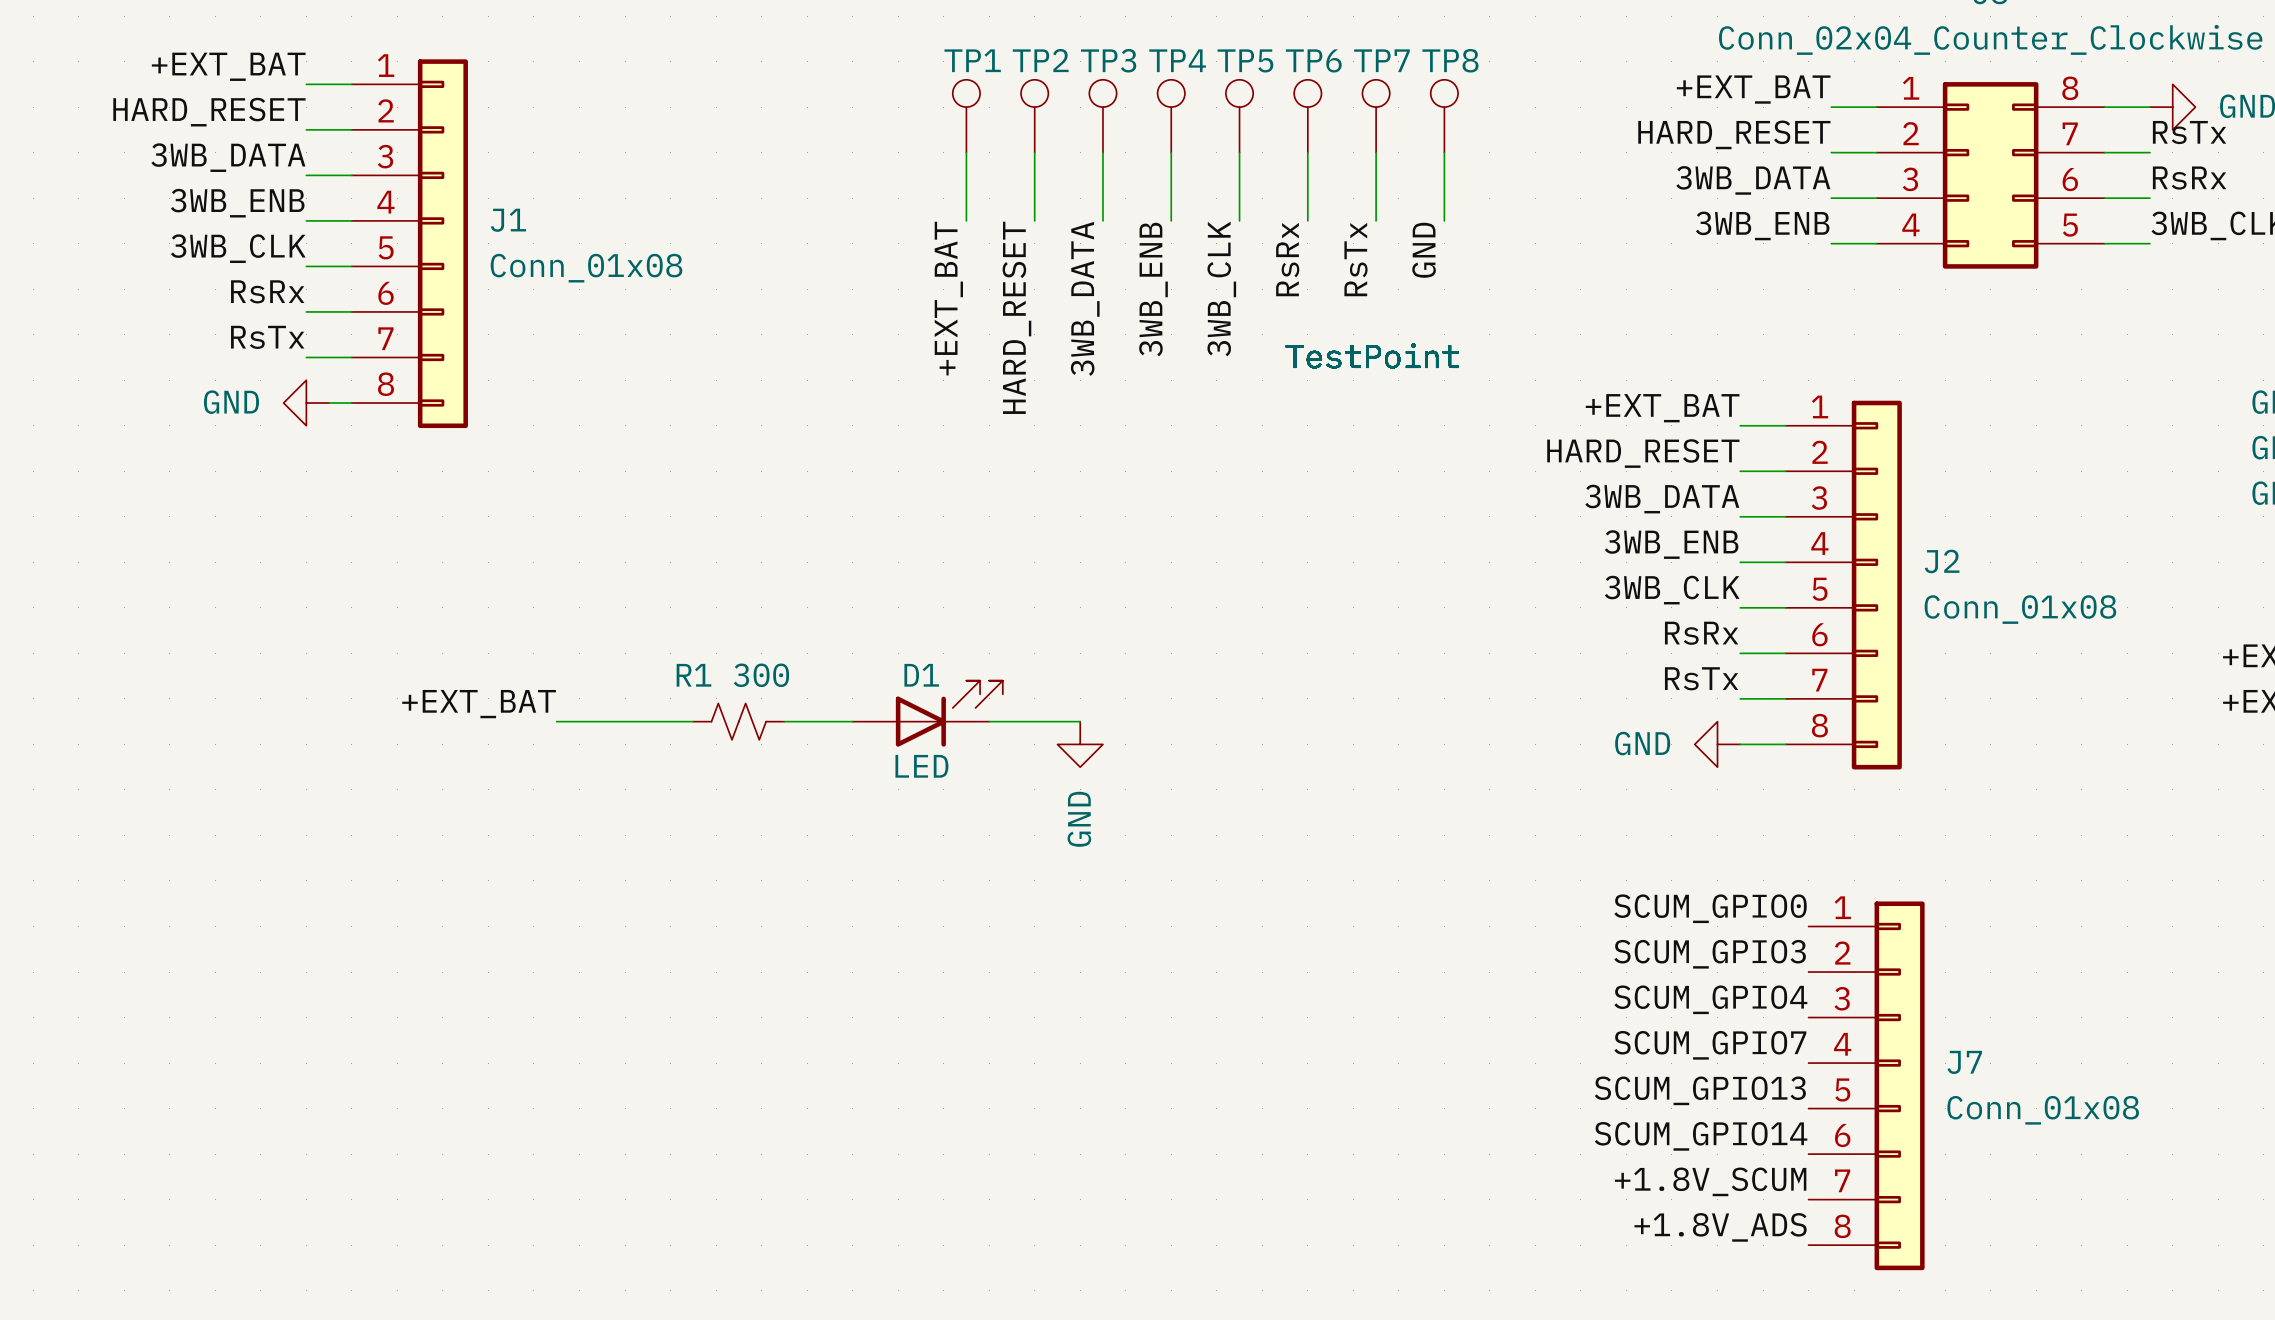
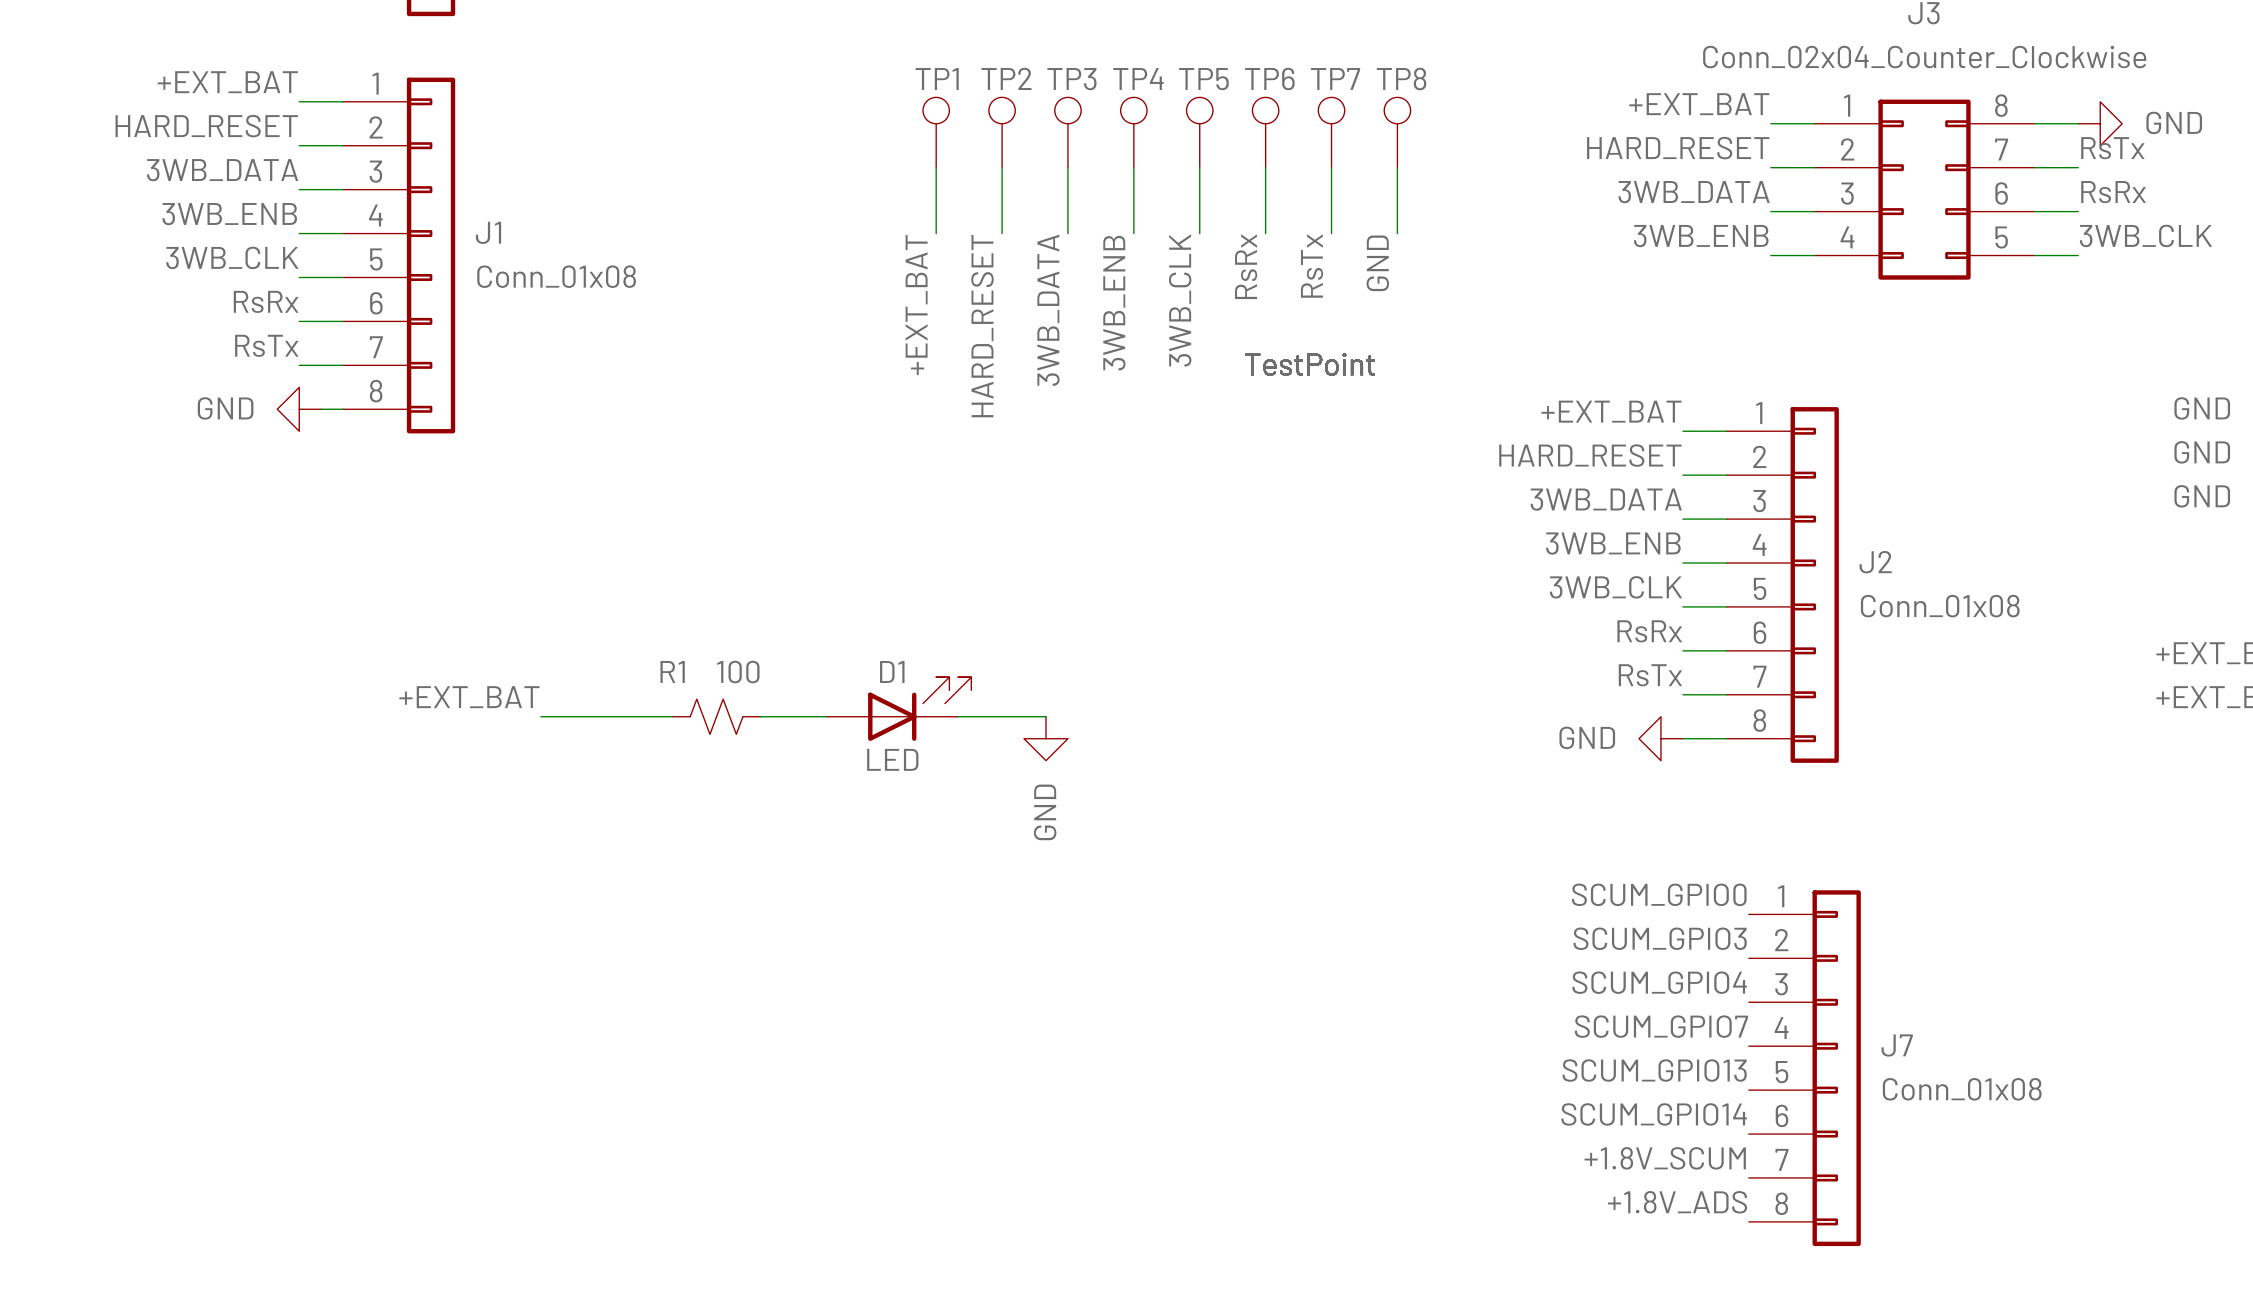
R1 value: 300 (761, 675) -> 100 (738, 672)

